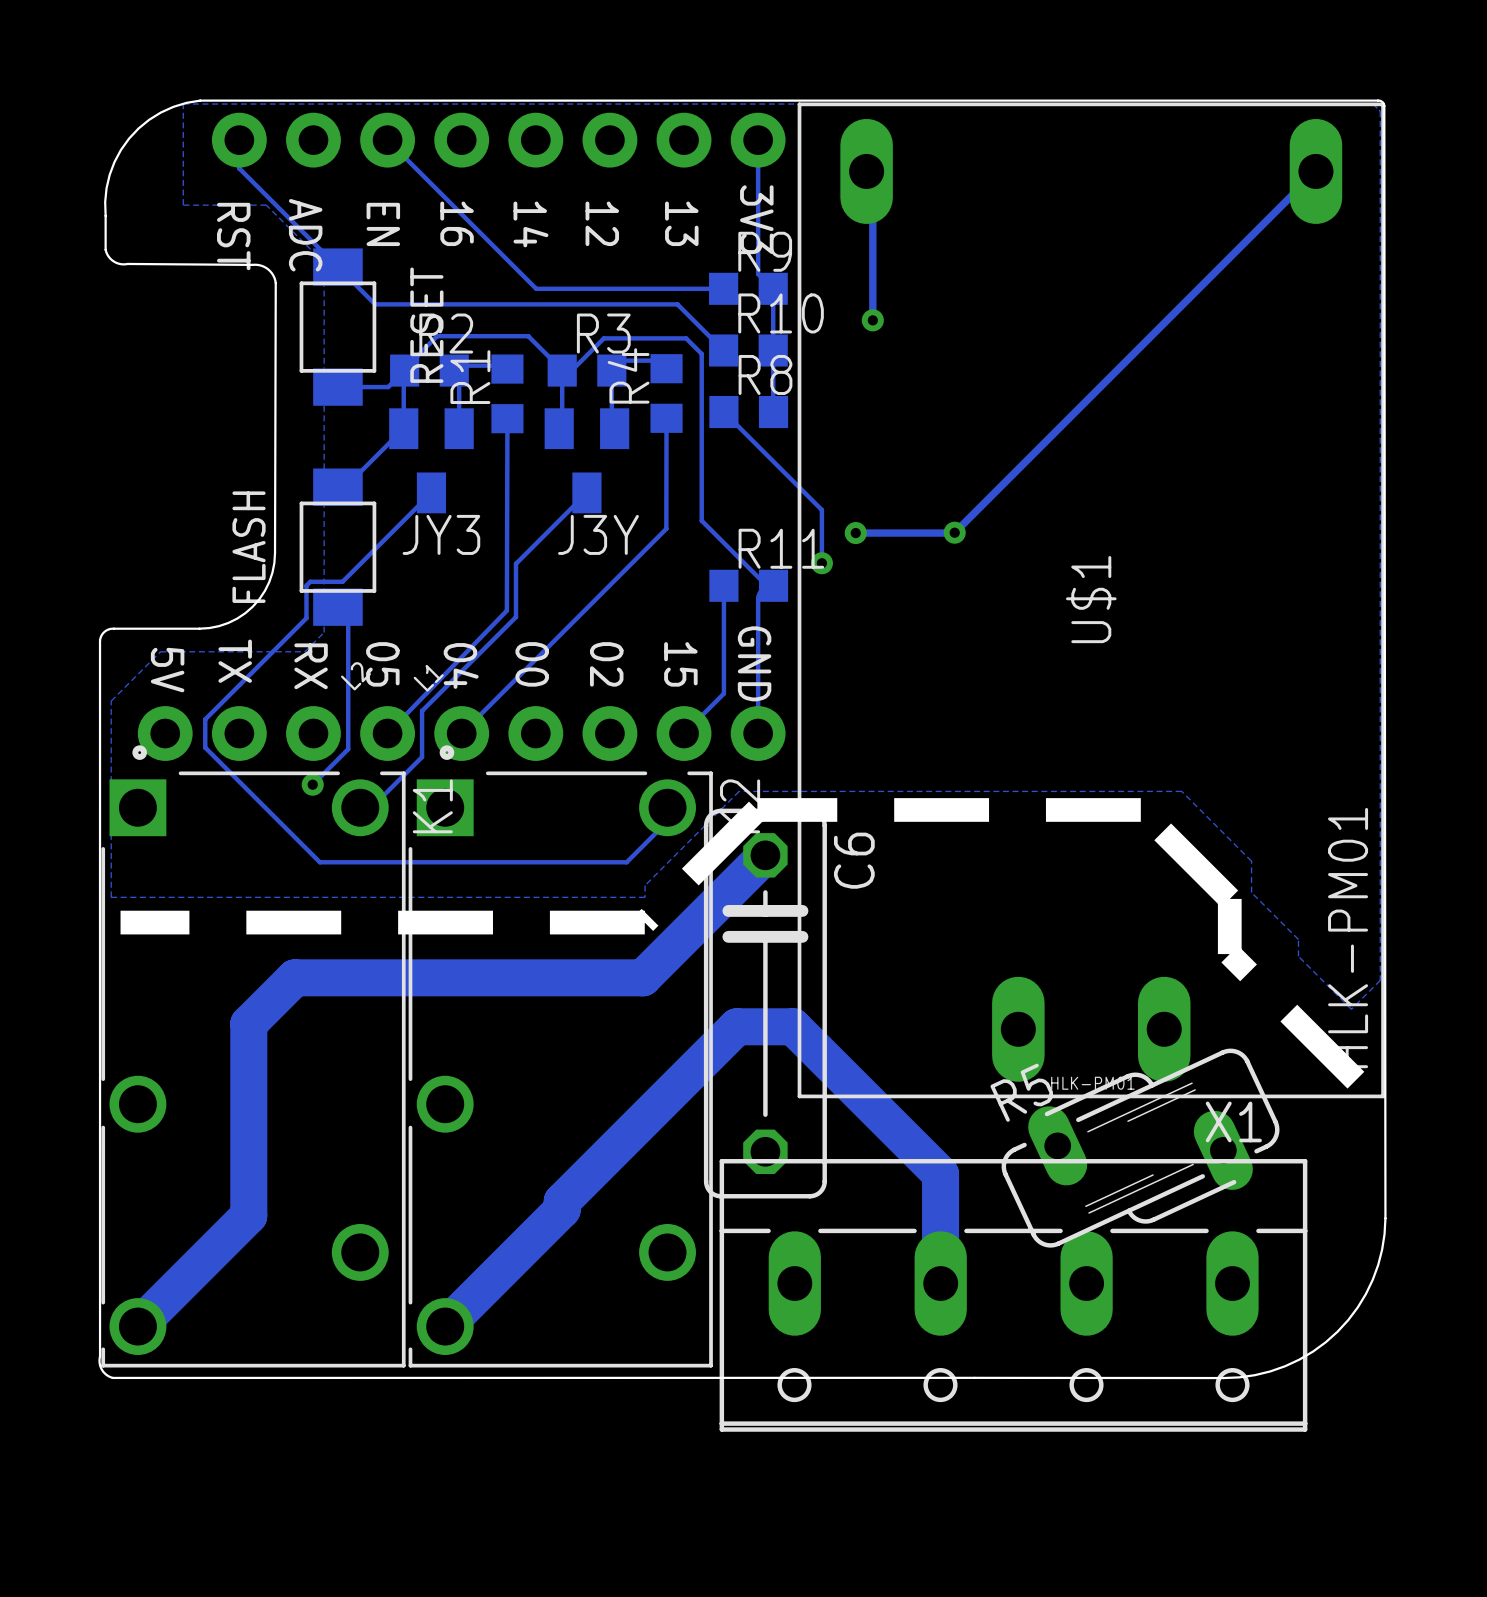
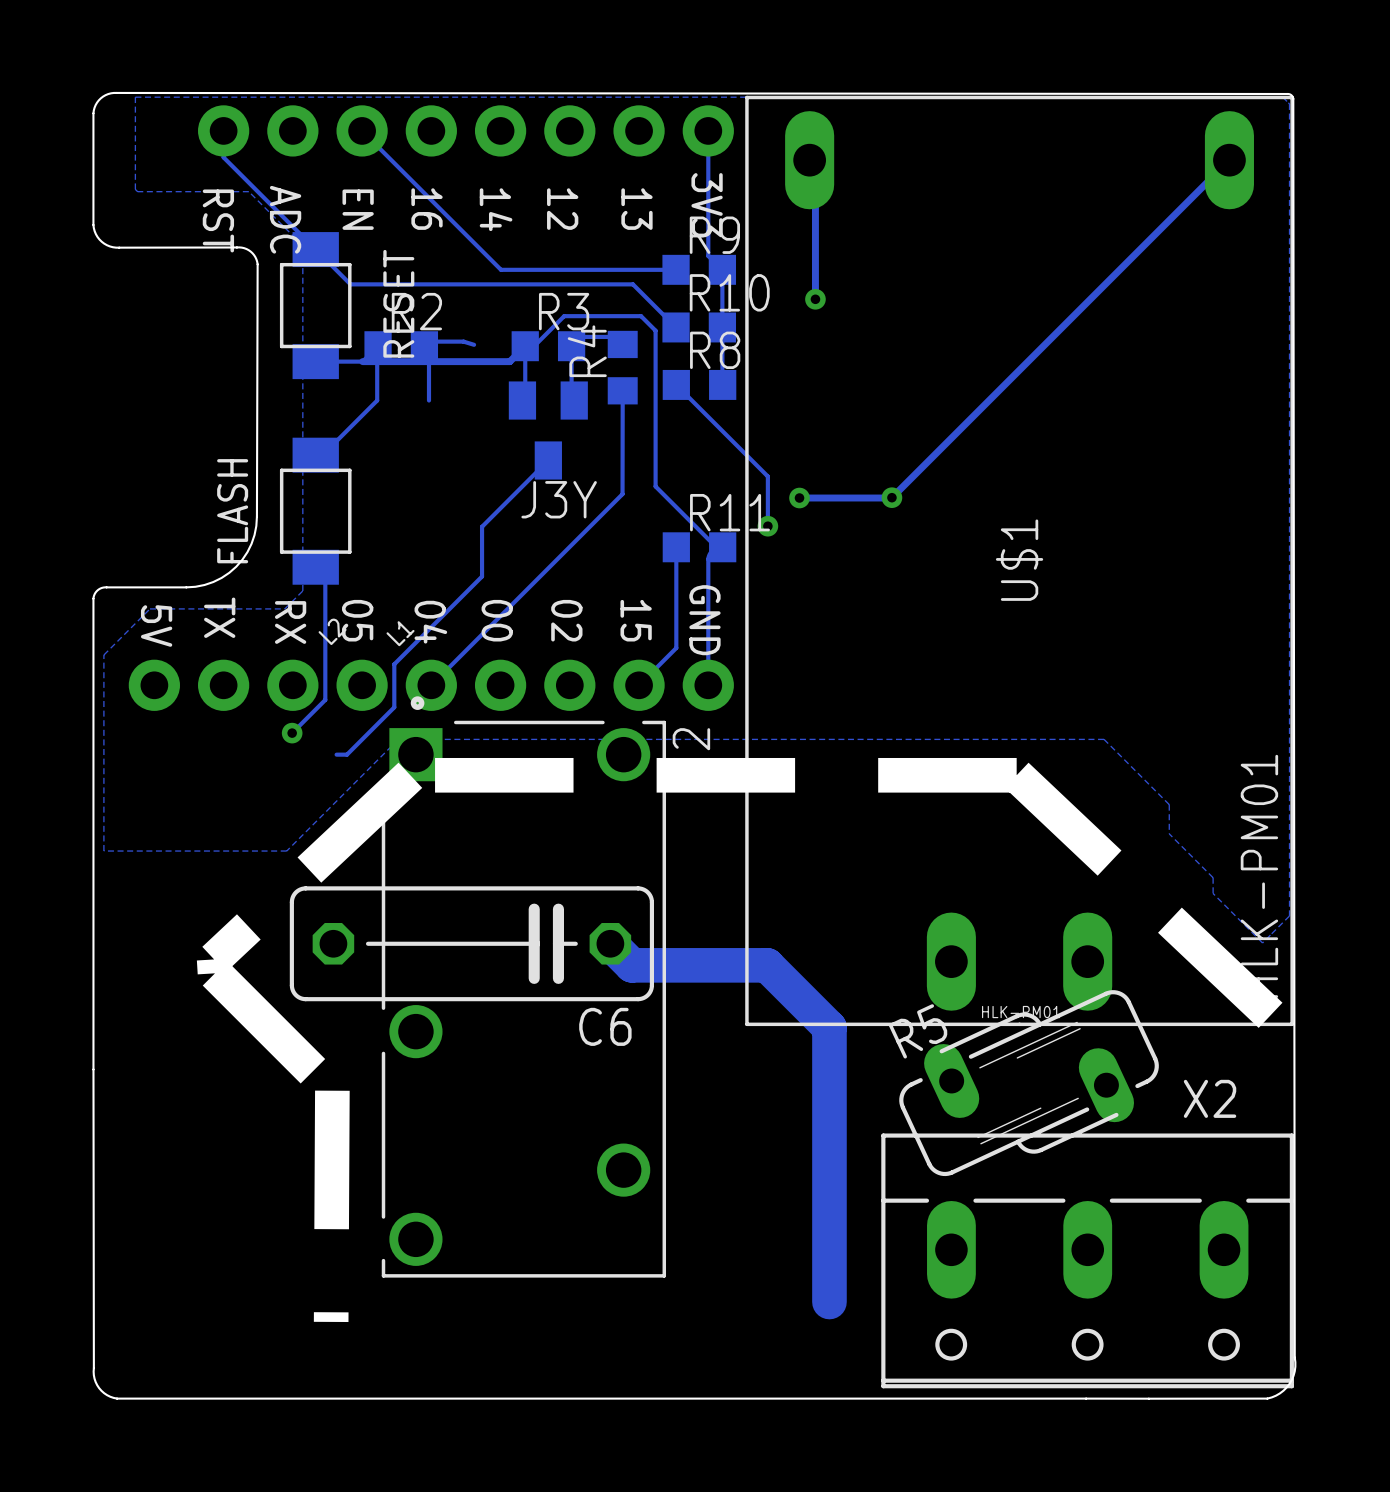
board edge: (1377, 100) (200, 100) (173, 106) (149, 119) (138, 128) (129, 138) (114, 162) (106, 188) (105, 249) (110, 258) (122, 264) (257, 264) (269, 270) (275, 282) -> (1287, 94) (113, 92) (100, 98) (95, 105) (93, 113) (93, 224) (99, 239) (106, 245) (116, 247) (241, 247) (252, 253) (257, 264)
zone outline: (183, 104) (183, 205) -> (171, 97) (135, 97) (135, 189) (137, 191) (171, 191)
board edge: (1384, 105) (1385, 1218) (1382, 1249) (1372, 1279) (1365, 1294) (1348, 1320) (1325, 1342) (1313, 1351) (1285, 1366) (1254, 1375) (1223, 1378) (112, 1377) (103, 1371) (99, 1360) (100, 1144) -> (1293, 98) (1295, 1366) (1291, 1379) (1283, 1390) (1267, 1398) (113, 1397) (99, 1388) (93, 1375) (93, 1069)
track: (562, 370) (528, 336) (437, 336) (404, 370) -> (525, 346) (509, 361) (362, 361)
R1: (507, 393) -> none
track: (507, 418) (506, 610) (387, 733) -> none
JY3: (431, 460) -> none
track: (431, 492) (342, 581) (310, 581) (306, 585) (306, 618) (205, 719) (205, 747) (319, 862) (626, 862) (667, 821) (667, 807) -> none
zone outline: (739, 791) (645, 885) (645, 897) (111, 897) -> (690, 739) (398, 739) (286, 851) (103, 851) (103, 838)
track: (765, 855) (642, 977) (294, 977) (248, 1023) (248, 1215) (137, 1326) -> none
board edge: (120, 922) (644, 922) (757, 809) (1140, 809) (1229, 898) (1229, 954) (1355, 1080) -> none
C6 rotation: 0° (765, 1003) -> 90° clockwise (471, 943)
C6 position: (765, 1003) -> (471, 943)
track: none -> (610, 943) (631, 965) (767, 965) (829, 1027) (829, 1302)
K1: (253, 1056) -> none
board edge: none -> (1270, 1015) (1016, 775) (410, 775) (214, 959) (215, 973) (332, 1090) (331, 1321)
R5 position: (1140, 1148) -> (1029, 1083)
track: (940, 1283) (940, 1174) (793, 1026) (736, 1026) (562, 1201) (562, 1209) (445, 1326) -> none
X1: (1013, 1295) -> none
X2: none -> (1087, 1260)

